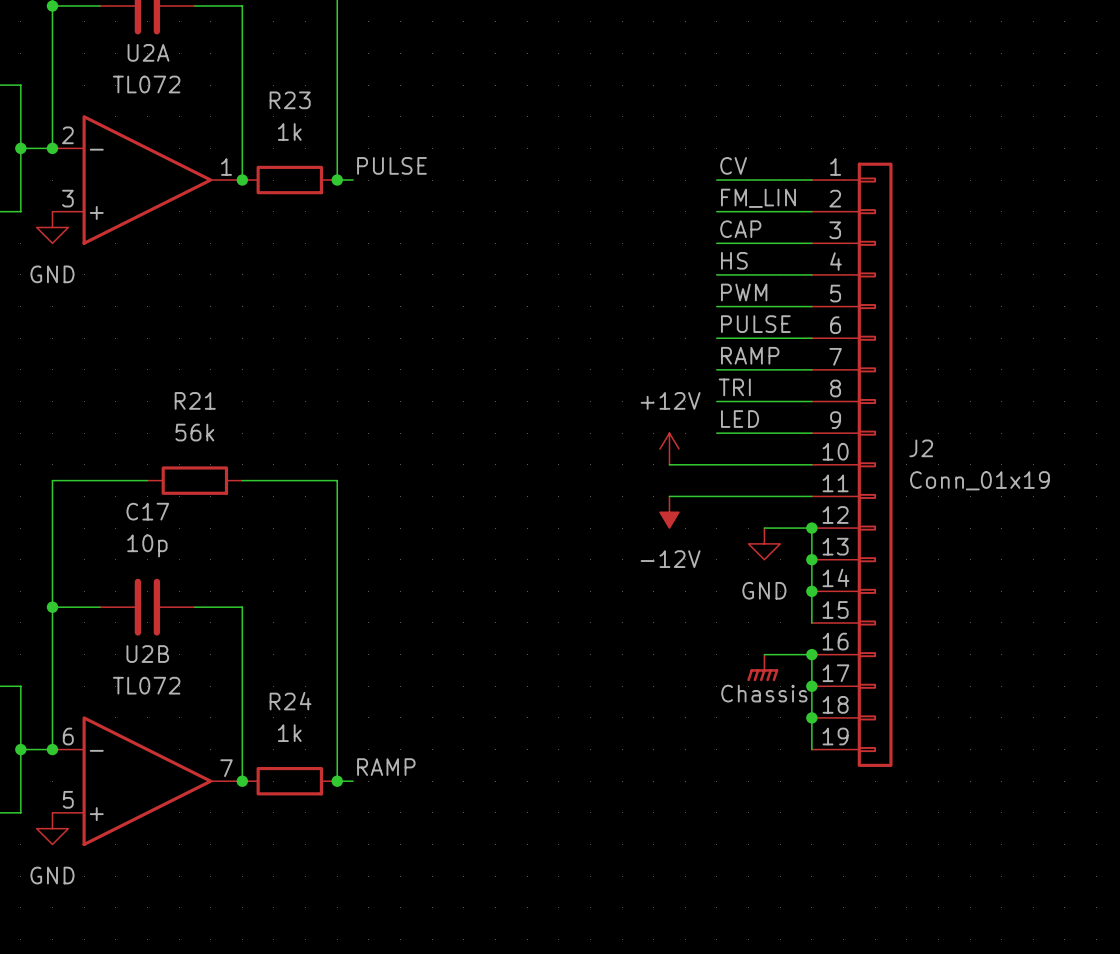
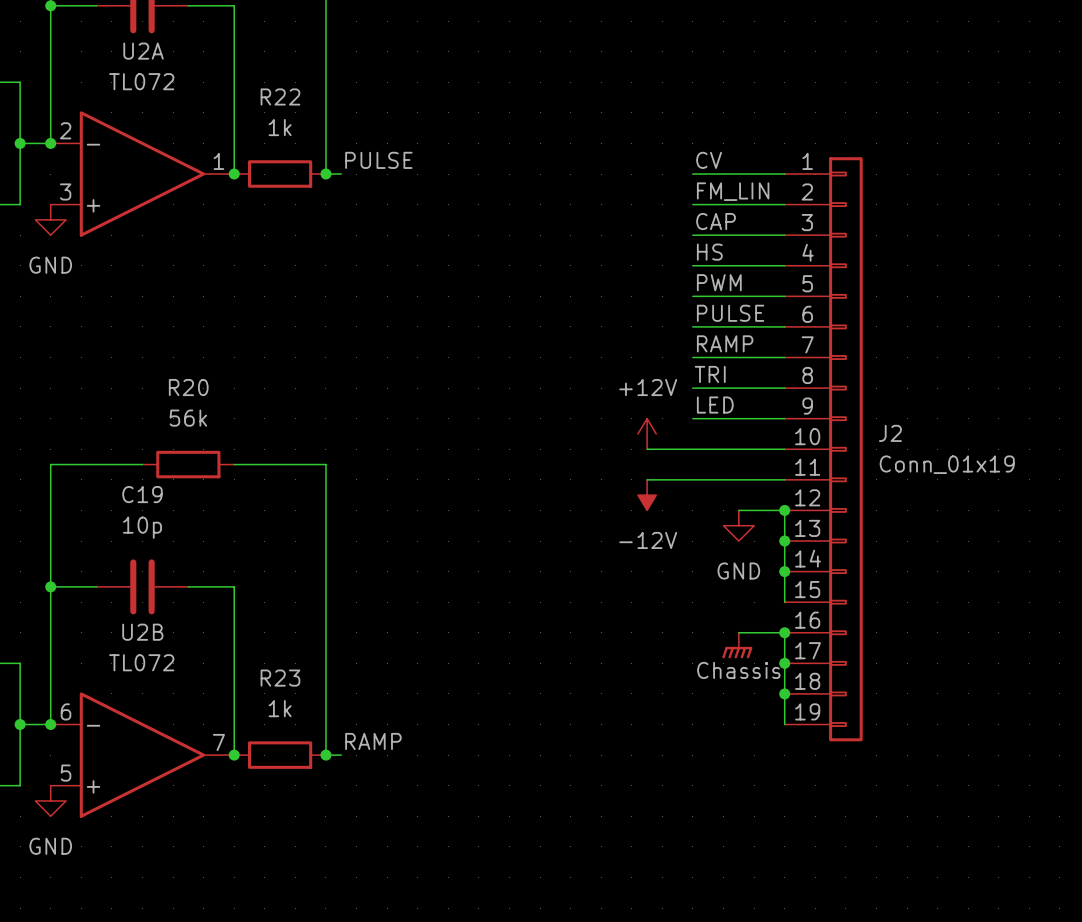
R23 name: R23 (290, 100) -> R22 (280, 96)
R21 name: R21 (195, 400) -> R20 (188, 387)
C17 name: C17 (147, 511) -> C19 (142, 494)
R24 name: R24 (290, 701) -> R23 (280, 678)

